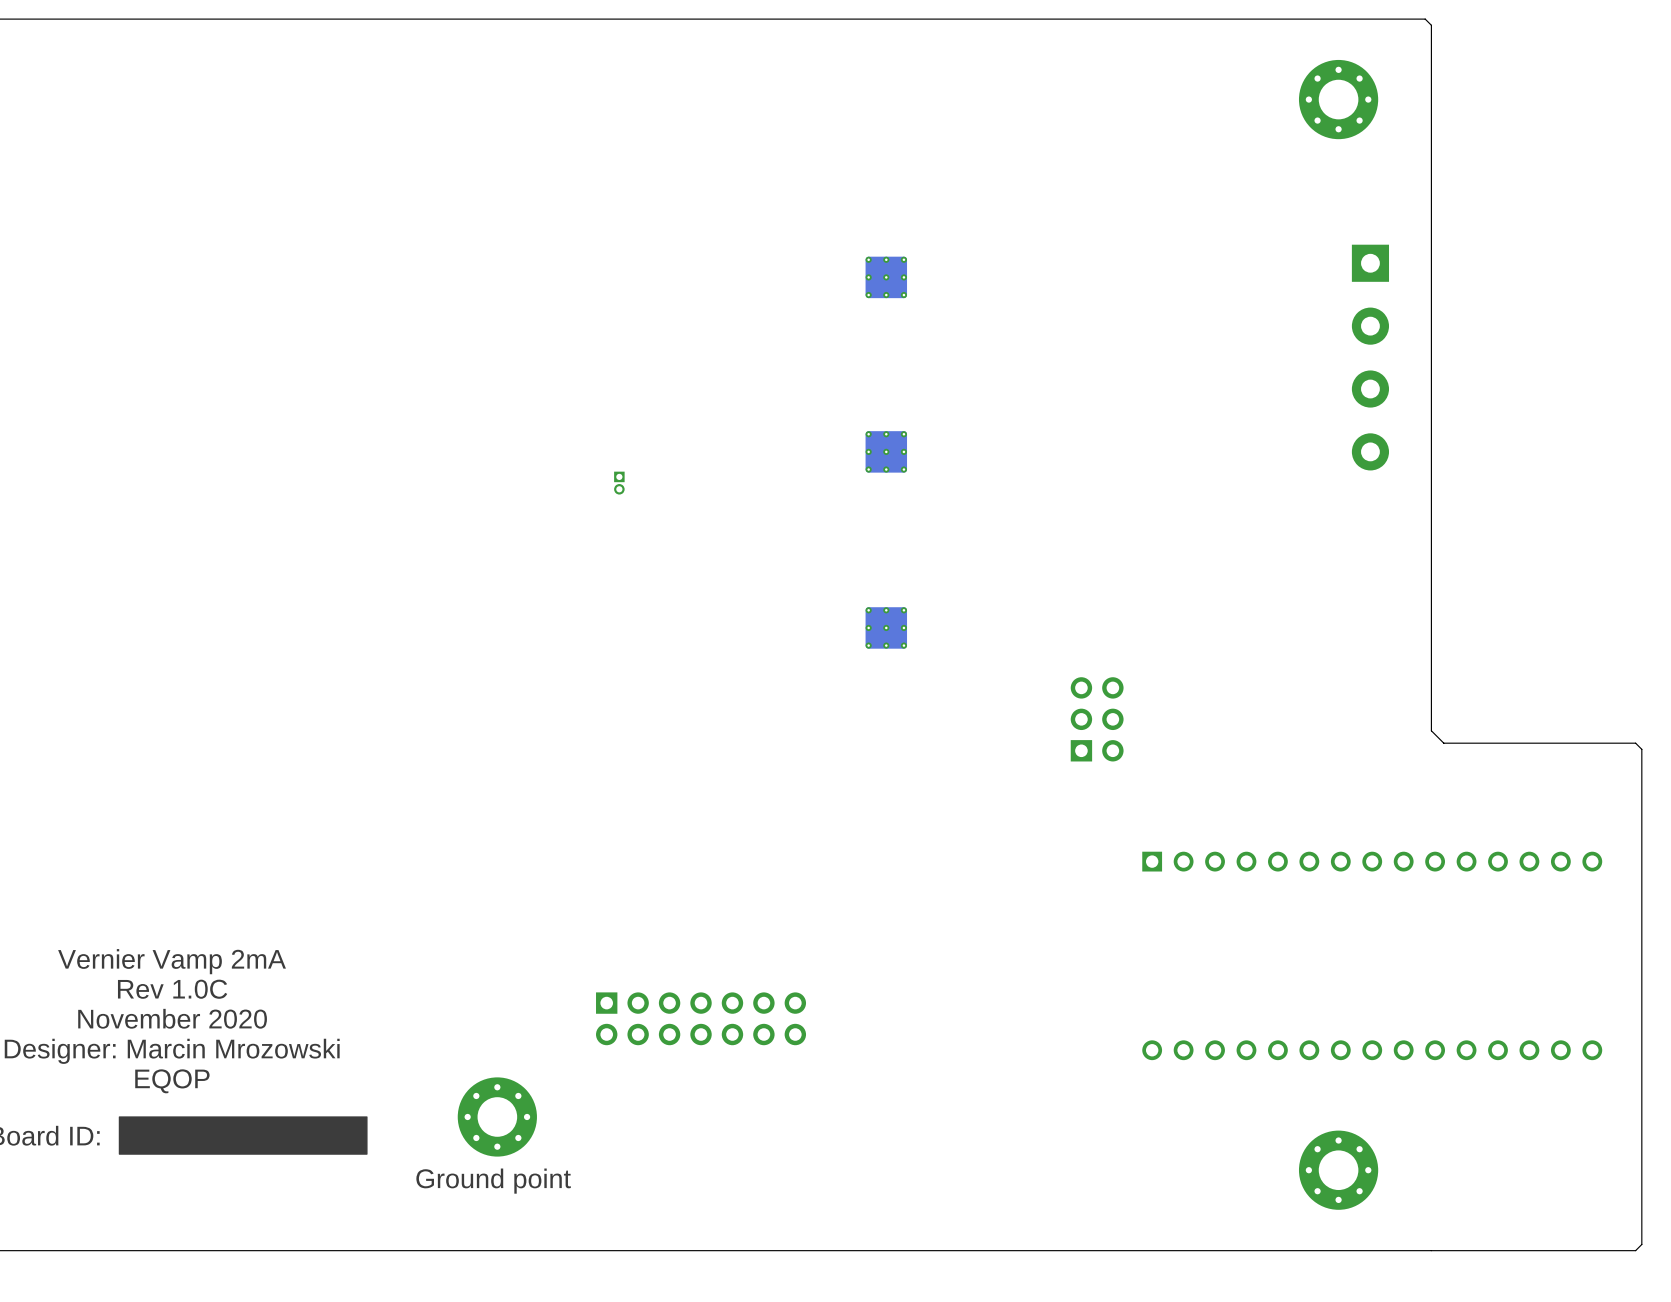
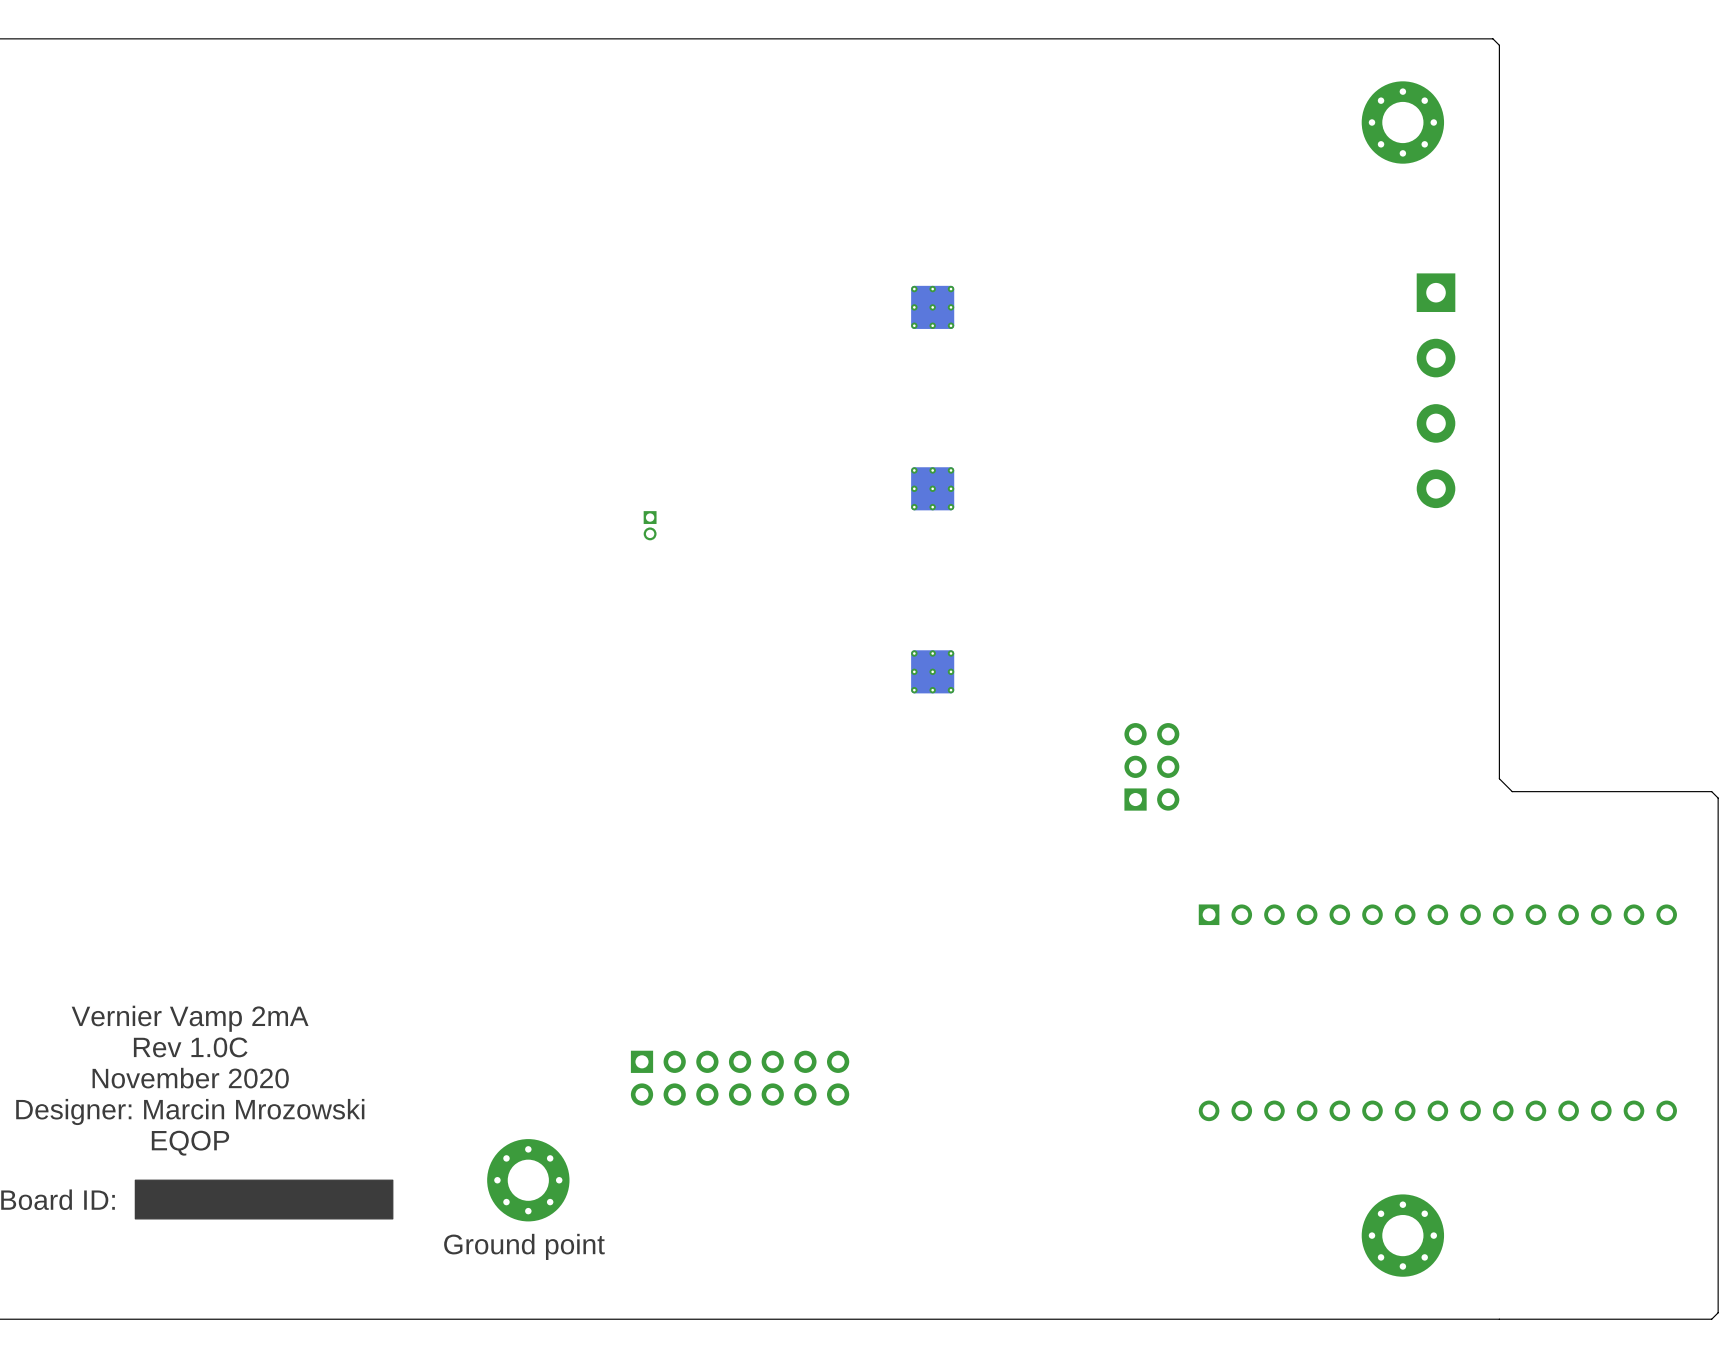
part footprint: [614, 471, 625, 495] -> [643, 511, 657, 541]

